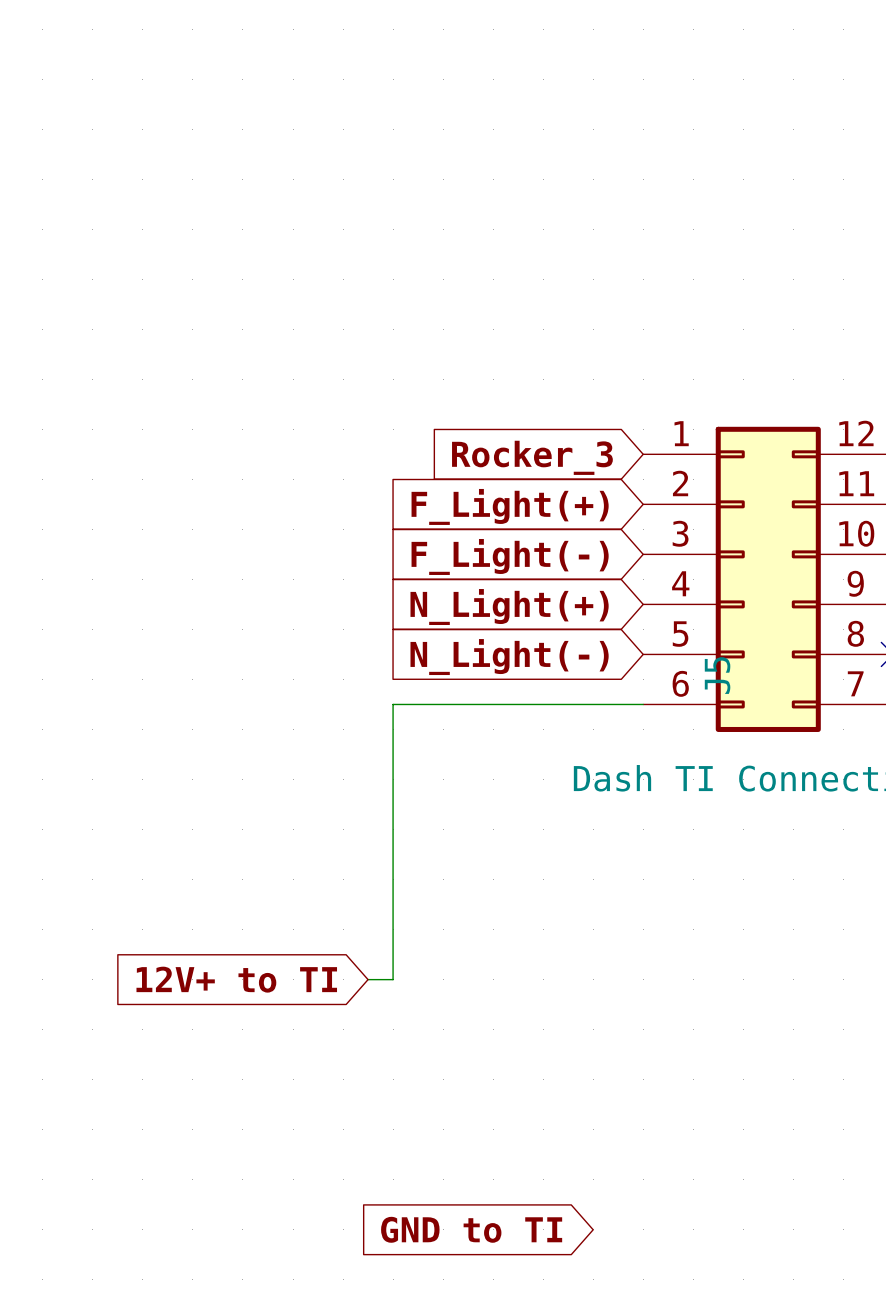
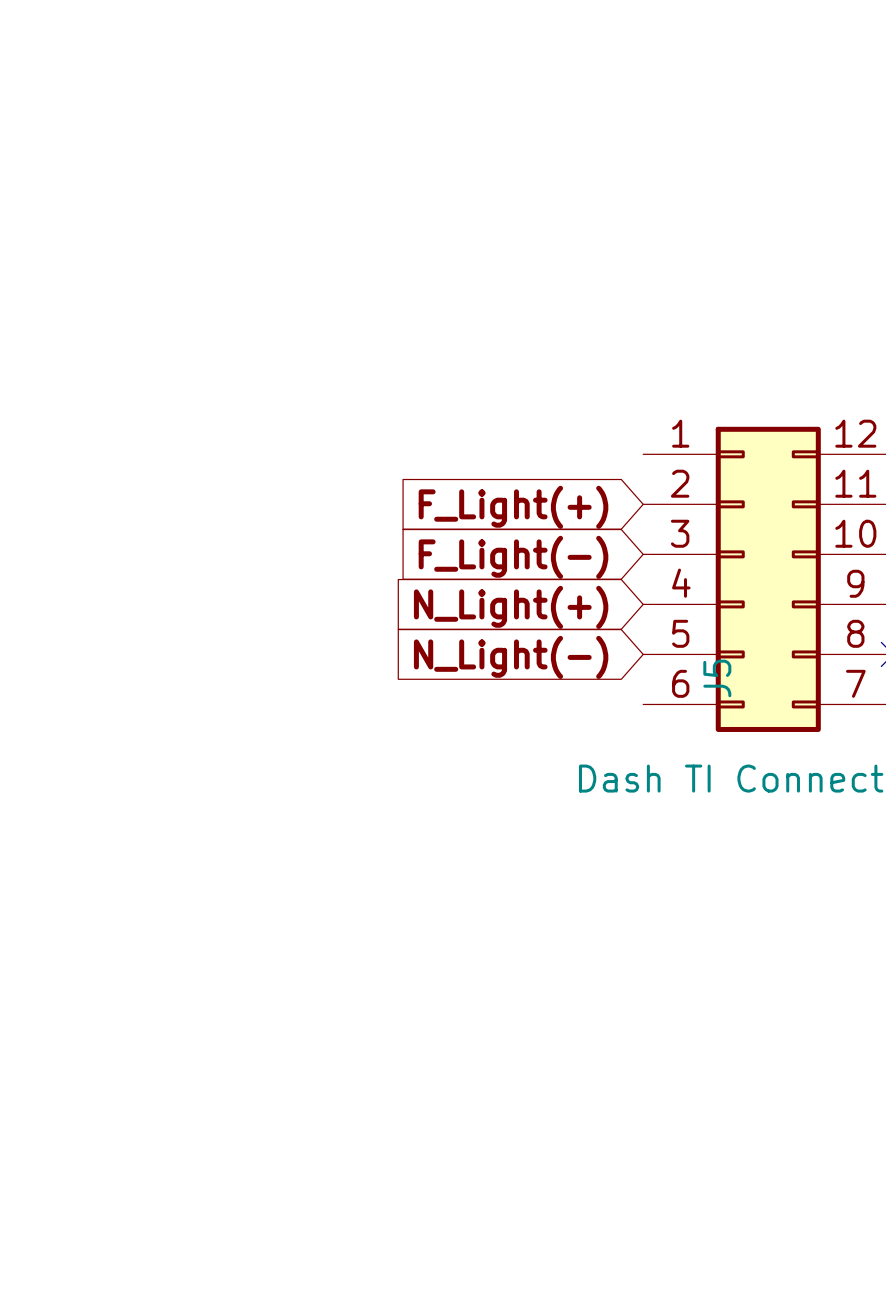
global label: Rocker_3 (532, 457) -> none
wire: (643, 704) (393, 704) (393, 979) (368, 979) -> none
global label: 12V+ to TI (236, 979) -> none
global label: GND to TI (471, 1229) -> none

